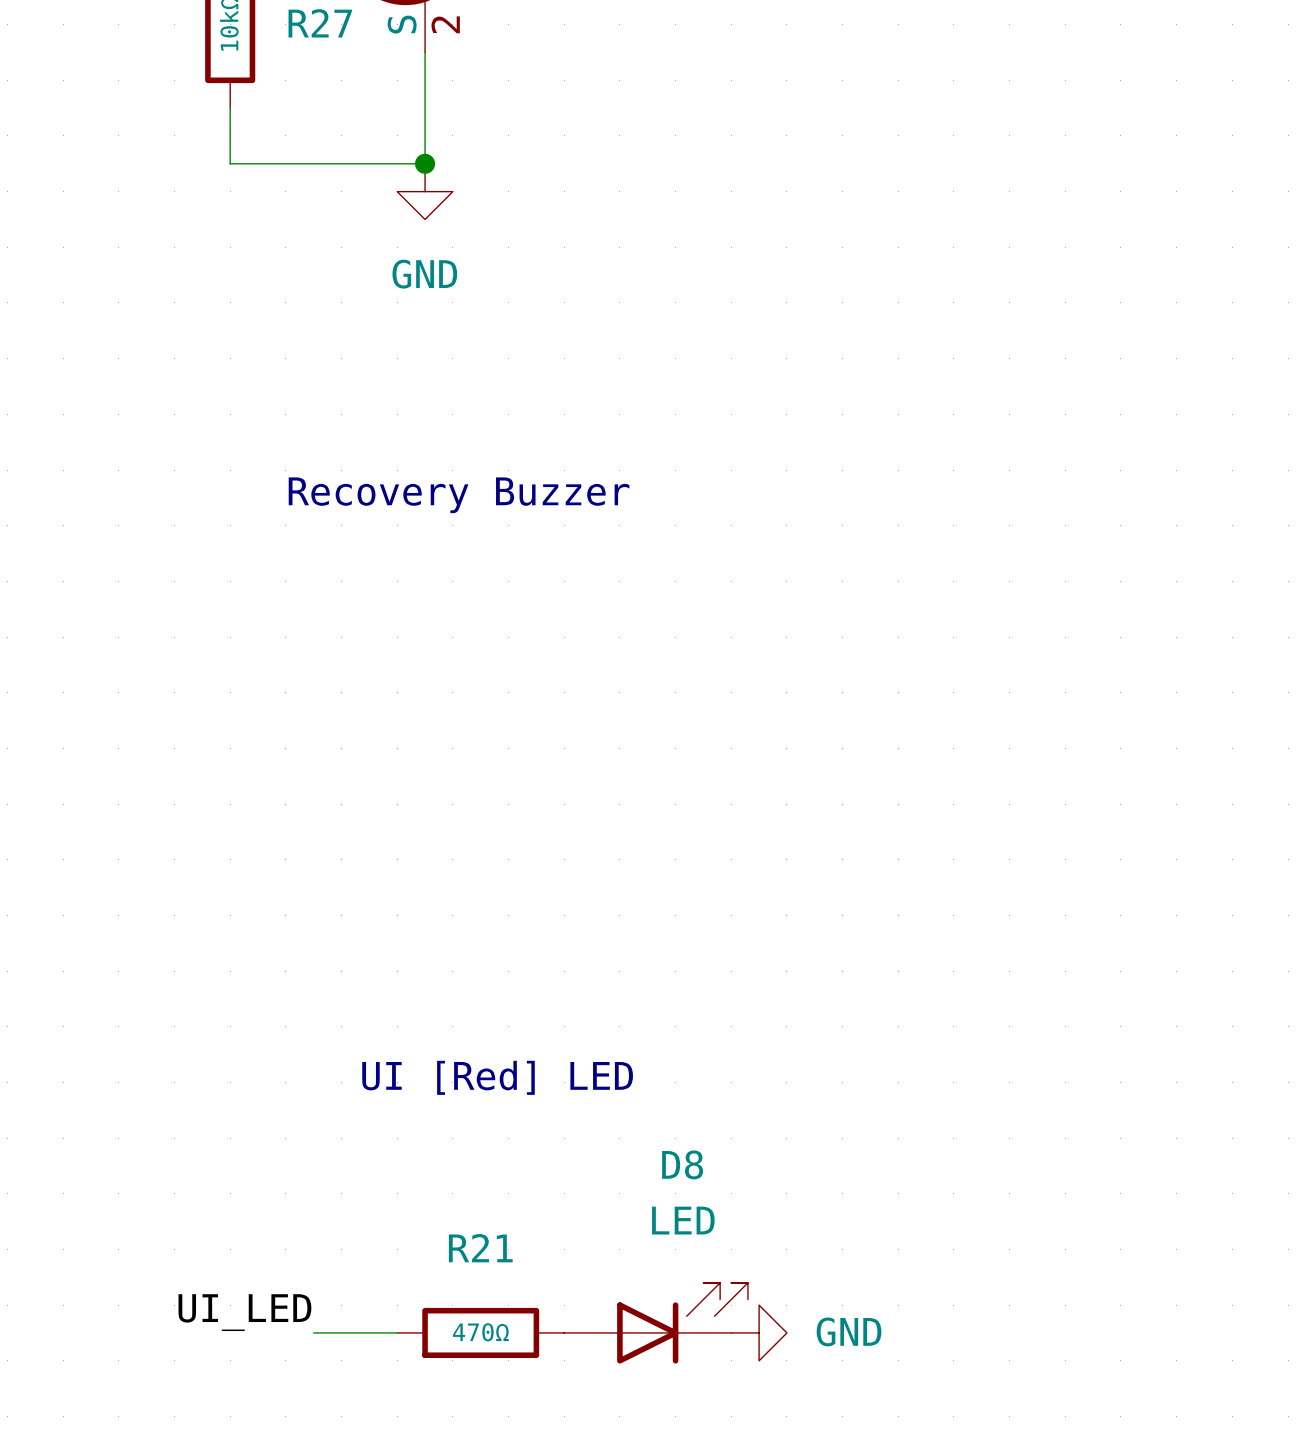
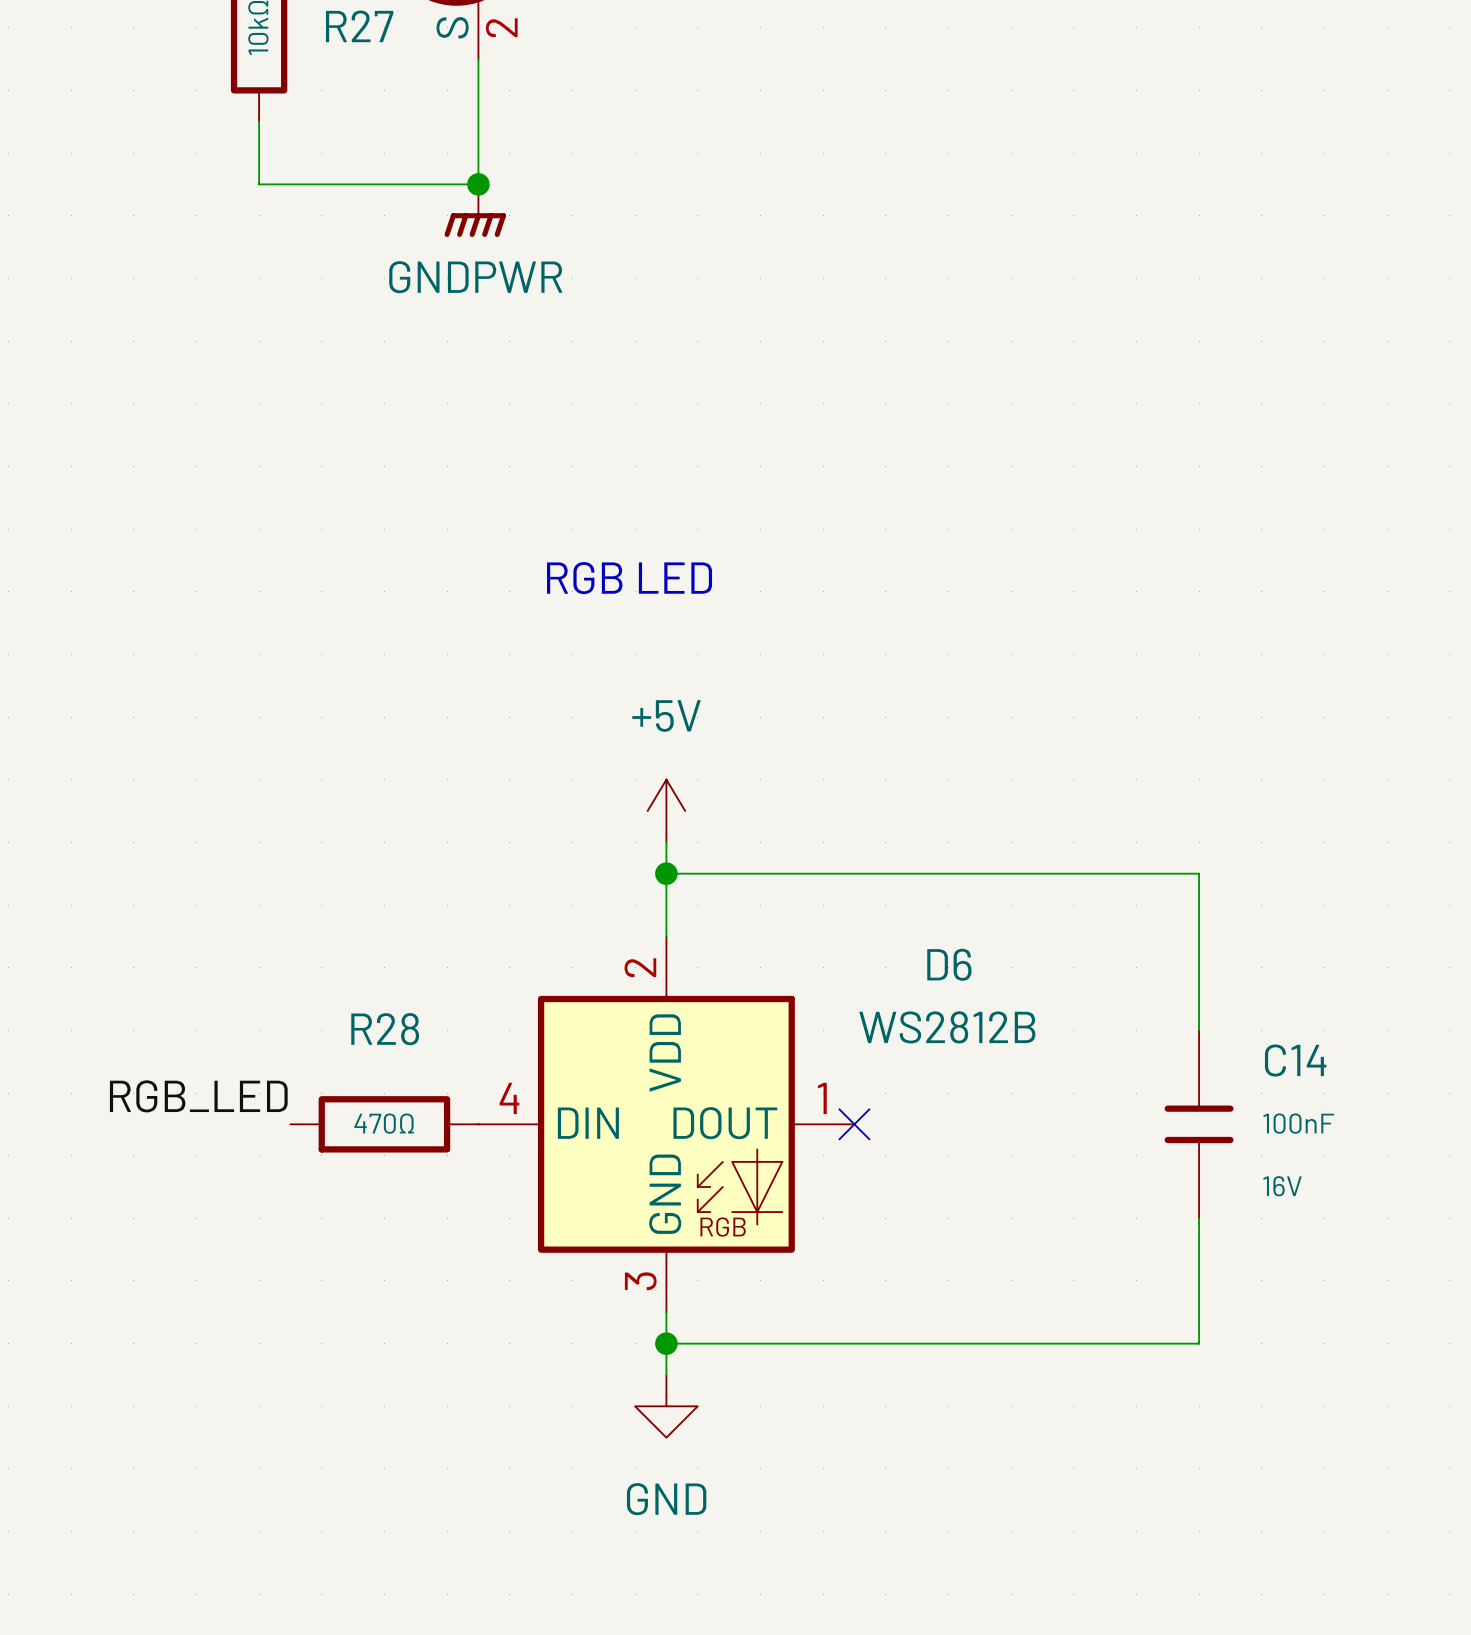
power symbol: GND (425, 191) -> GNDPWR (475, 210)
text: Recovery Buzzer (459, 495) -> none
text: none -> RGB LED (629, 578)
power symbol: none -> +5V (666, 811)
wire: none -> (666, 842) (666, 936)
wire: none -> (666, 873) (1199, 873) (1199, 1030)
junction: none -> (666, 873)
label: none -> RGB_LED (198, 1096)
R28: none -> 470Ω (384, 1124)
D6: none -> WS2812B (666, 1124)
no-connect mark: none -> (854, 1124)
C14: none -> 100nF (1199, 1124)
text: UI [Red] LED (497, 1077) -> none
wire: none -> (1199, 1218) (1199, 1343) (666, 1343)
wire: none -> (666, 1312) (666, 1374)
junction: none -> (666, 1343)
label: UI_LED (244, 1312) -> none
D8: LED (656, 1323) -> none
wire: (313, 1332) (397, 1332) -> none
R21: 470Ω (480, 1332) -> none
power symbol rotation: 0° (759, 1332) -> 90° clockwise (666, 1406)
power symbol position: GND (759, 1332) -> GND (666, 1406)

